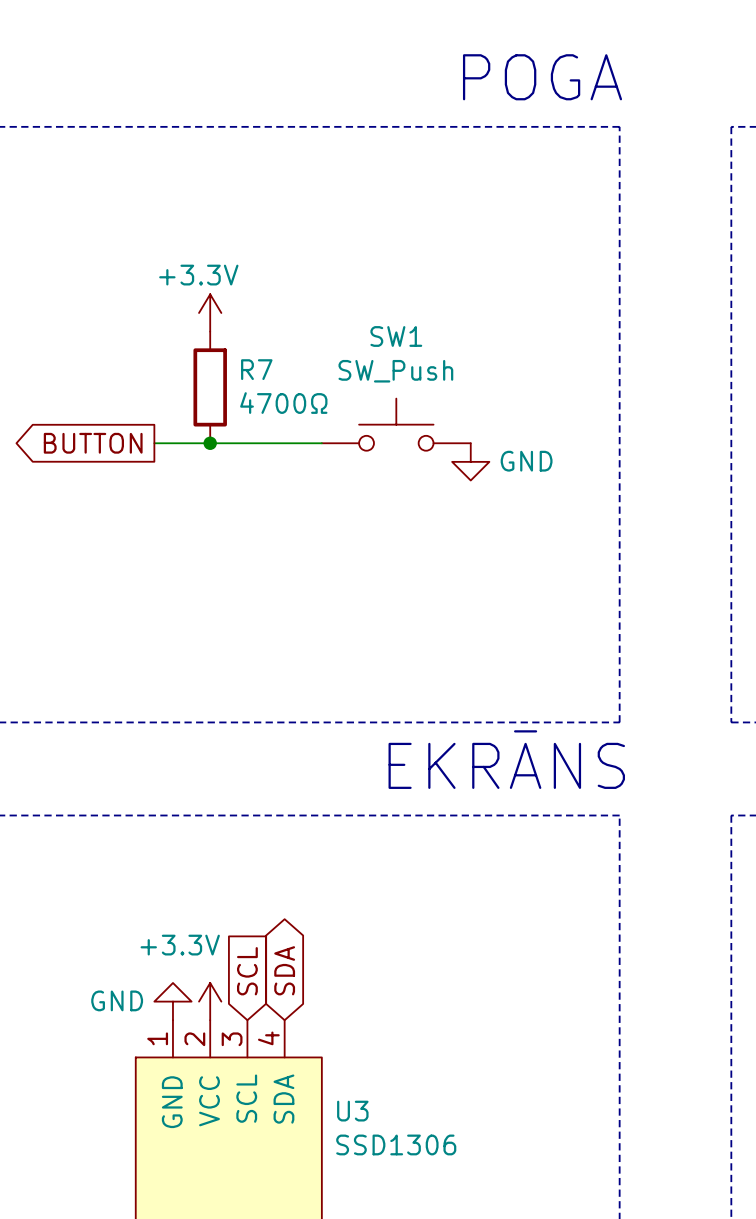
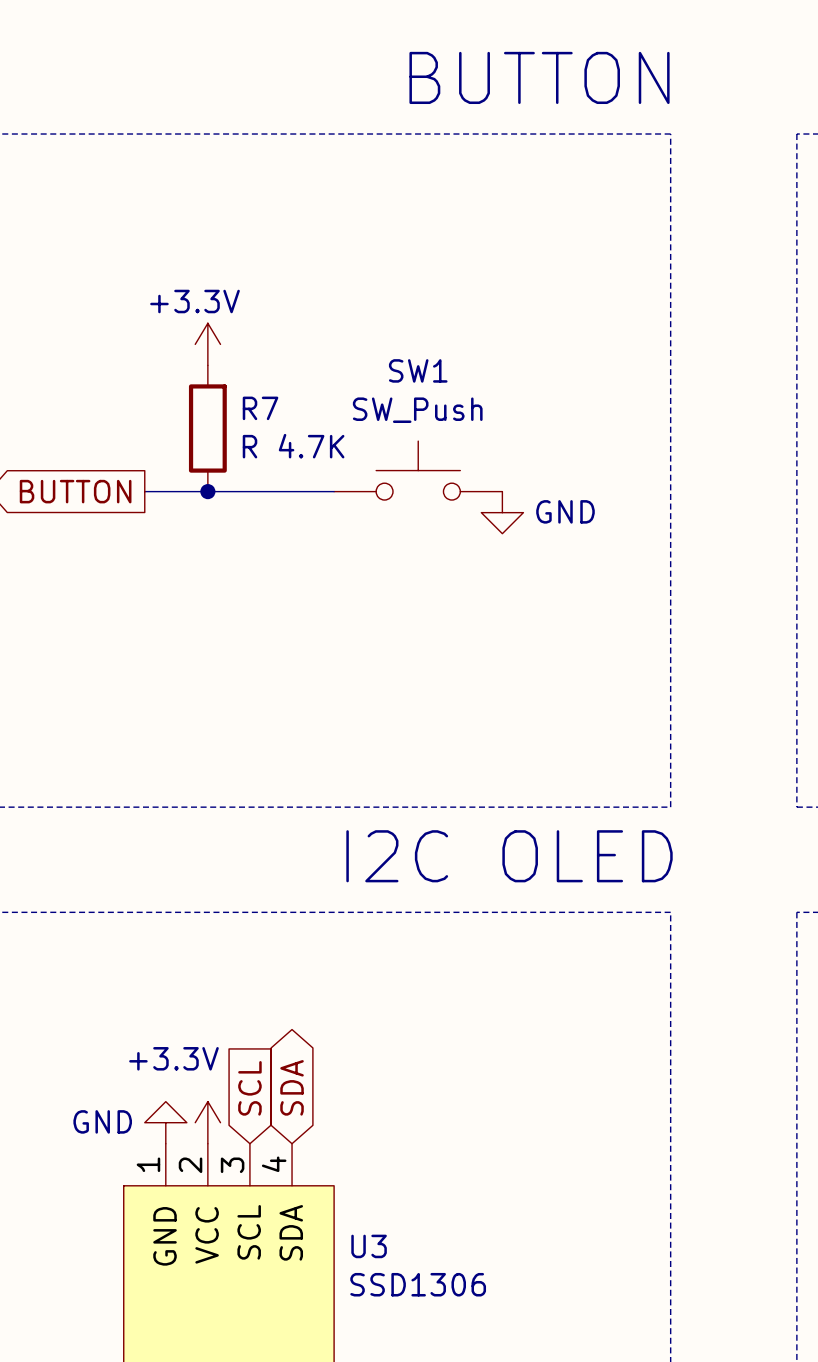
text: none -> BUTTON (539, 77)
text: POGA (542, 77) -> none
R7 value: 4700Ω (283, 403) -> R 4.7K (293, 446)
text: EKRĀNS (506, 759) -> none
text: none -> I2C OLED (509, 856)

